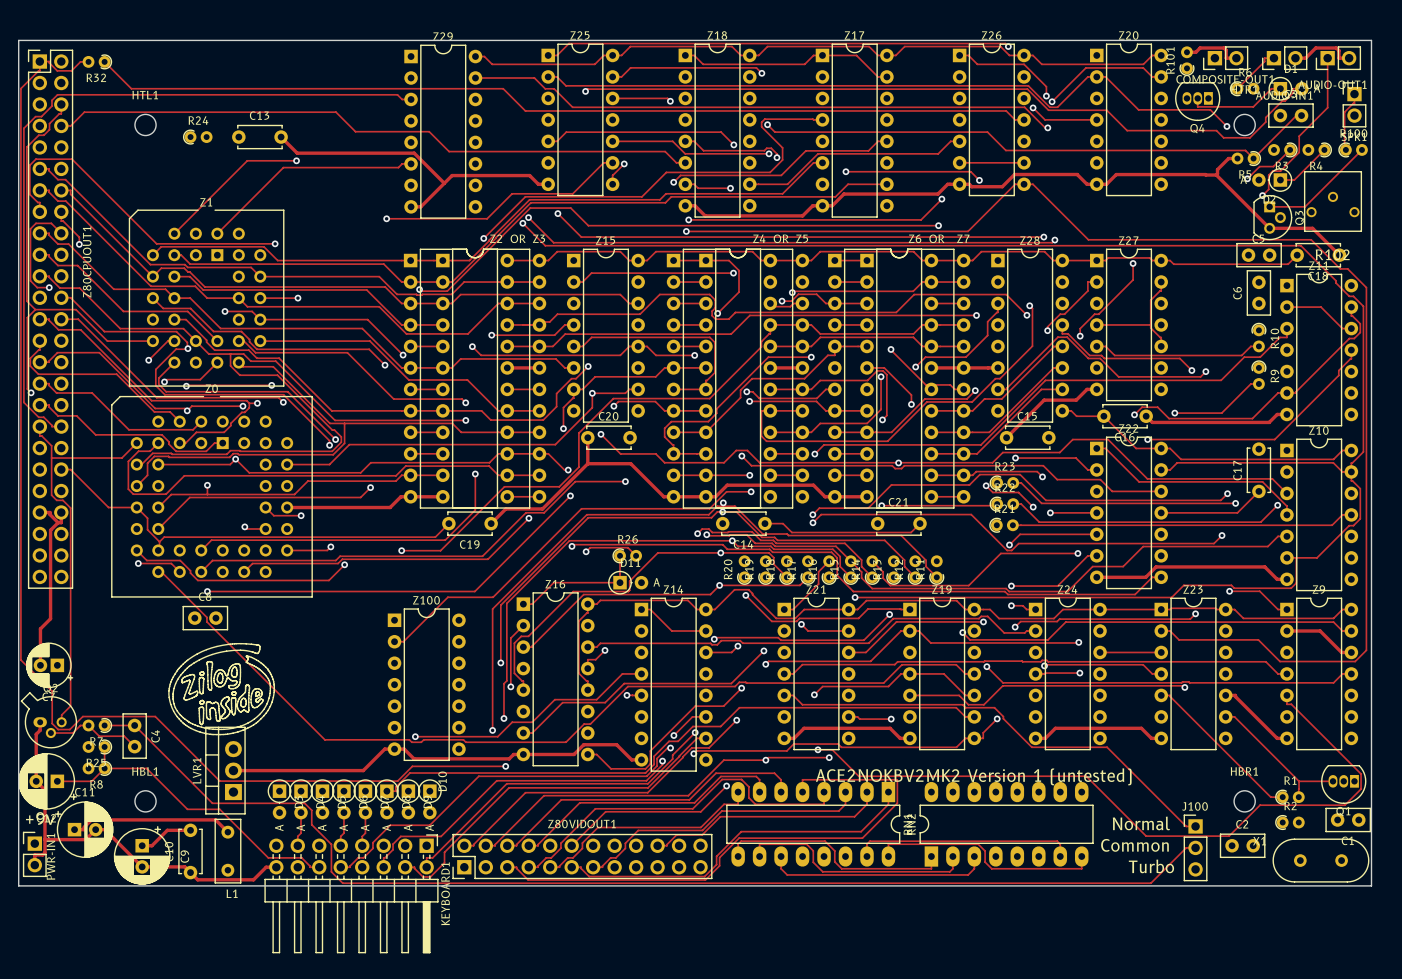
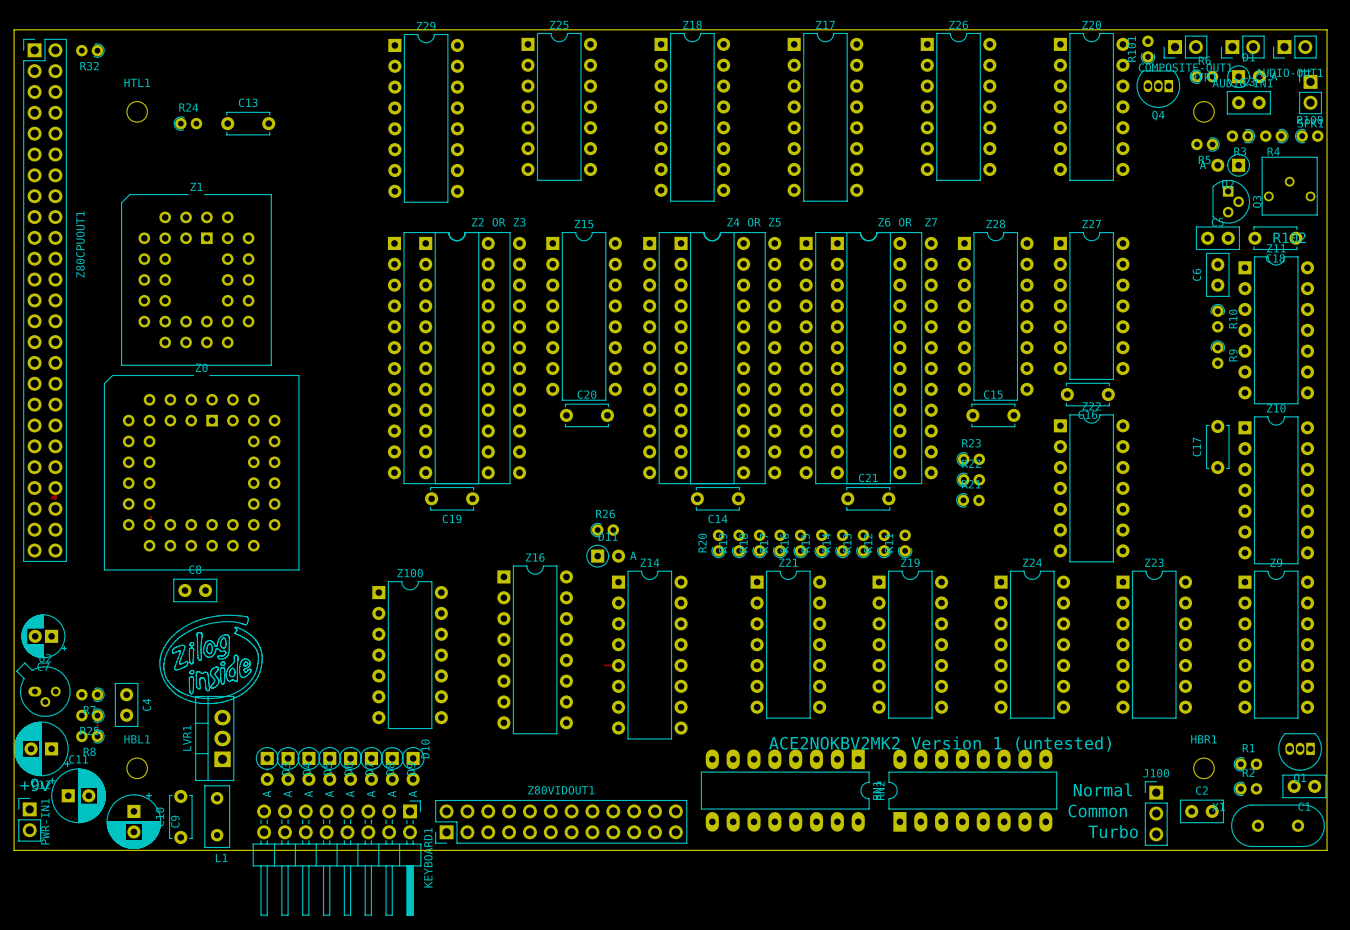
track: (1008, 46) (1005, 43) (569, 43) (557, 55) (548, 55) -> none
via: (1008, 46) -> none
track: (1186, 52) (1195, 52) (1200, 48) (1223, 48) (1226, 50) (1226, 58) (1236, 58) -> none
track: (685, 55) (694, 55) (703, 64) (804, 64) (813, 55) (856, 55) (878, 76) (886, 76) -> none
track: (959, 55) (968, 55) (977, 64) (1024, 64) (1046, 86) (1046, 96) -> none
track: (1161, 55) (1152, 55) (1143, 64) (1041, 64) (1032, 55) (1009, 55) (1000, 46) (904, 46) (895, 55) (878, 55) (869, 46) (767, 46) (758, 55) (740, 55) (731, 46) (630, 46) (621, 55) (603, 55) (594, 64) (492, 64) (484, 56) (475, 56) -> none
track: (1273, 58) (1264, 58) (1264, 61) (1237, 88) -> none
track: (1295, 58) (1305, 58) (1315, 48) (1336, 48) (1338, 50) (1338, 58) (1349, 58) -> none
track: (1327, 58) (1327, 107) (1299, 136) (1299, 152) (1280, 171) (1272, 171) (1268, 175) (1268, 189) (1262, 195) -> none
track: (88, 61) (80, 61) (71, 70) (57, 70) (49, 61) (39, 61) (39, 70) (20, 88) (20, 660) (52, 691) (52, 723) (58, 729) (69, 729) (82, 716) (155, 716) (219, 781) (397, 781) (412, 766) (505, 766) -> none
track: (104, 61) (131, 88) (503, 88) (525, 110) (1006, 110) (1015, 119) (1024, 119) -> none
track: (761, 73) (756, 67) (630, 67) (621, 76) (612, 76) -> none
via: (761, 73) -> none
track: (548, 76) (557, 76) (566, 85) (1028, 85) (1049, 107) (1057, 107) (1087, 76) (1105, 76) (1138, 109) (1210, 109) (1226, 126) -> none
track: (1161, 76) (1152, 76) (1143, 67) (1085, 67) (1052, 101) -> none
track: (475, 78) (534, 78) (545, 88) (554, 88) (572, 107) (1024, 107) (1045, 127) (1047, 127) -> none
track: (1280, 88) (1271, 88) (1253, 106) (1197, 106) (1197, 98) -> none
track: (1301, 88) (1292, 88) (1292, 93) (1265, 117) (1265, 122) (1250, 137) (1223, 137) (1216, 130) (1127, 130) (1106, 110) (1048, 110) (1027, 89) (587, 89) (585, 91) -> none
via: (585, 91) -> none
track: (1354, 94) (1354, 103) (1344, 112) (1345, 149) -> none
via: (1046, 96) -> none
track: (612, 98) (667, 98) (670, 101) -> none
track: (411, 99) (402, 99) (397, 94) (57, 94) (51, 100) (51, 106) (41, 116) (35, 116) (23, 128) (23, 402) (38, 417) (43, 417) (51, 426) (61, 426) -> none
via: (670, 101) -> none
via: (1052, 101) -> none
track: (61, 104) (61, 113) (49, 123) (49, 129) (43, 135) (38, 135) (26, 147) (26, 301) (35, 309) -> none
track: (1033, 107) (1045, 119) (1096, 119) -> none
via: (1033, 107) -> none
track: (1301, 115) (1296, 115) (1253, 158) (1245, 150) (1005, 150) (987, 132) (774, 132) (767, 124) -> none
track: (822, 119) (764, 119) (761, 122) (761, 126) (782, 147) (782, 159) (770, 172) (666, 172) (641, 196) (525, 196) (483, 238) -> none
via: (767, 124) -> none
track: (61, 125) (70, 125) (84, 112) (336, 112) (355, 131) (429, 131) (449, 151) (665, 151) (676, 162) (685, 162) -> none
via: (1226, 126) -> none
via: (1047, 127) -> none
track: (281, 137) (297, 153) (414, 153) (444, 183) -> none
track: (548, 141) (557, 141) (566, 132) (721, 132) (733, 144) -> none
track: (612, 141) (672, 141) (685, 153) (769, 153) -> none
track: (685, 141) (694, 141) (703, 150) (764, 150) (771, 148) (776, 153) (776, 157) -> none
track: (886, 141) (878, 141) (868, 150) (805, 150) (781, 175) (680, 175) (673, 182) -> none
track: (959, 141) (950, 141) (938, 153) (817, 153) (787, 184) (749, 184) -> none
via: (733, 144) -> none
track: (1290, 149) (1273, 166) (1259, 166) (1247, 178) -> none
track: (1324, 149) (1294, 180) (1280, 180) -> none
track: (1361, 149) (1305, 206) (1269, 206) -> none
via: (769, 153) -> none
via: (776, 157) -> none
track: (1237, 158) (1228, 158) (1217, 169) (1216, 175) -> none
track: (296, 160) (247, 160) (174, 233) -> none
via: (296, 160) -> none
track: (612, 162) (603, 162) (572, 193) (512, 193) (487, 218) (386, 218) -> none
track: (822, 162) (813, 162) (782, 193) (665, 193) (659, 199) (529, 199) (469, 260) (277, 260) (263, 246) (161, 246) (152, 255) -> none
track: (959, 162) (1024, 162) -> none
track: (411, 163) (402, 163) (398, 167) (283, 167) (217, 233) -> none
track: (624, 163) (612, 175) (612, 184) -> none
via: (624, 163) -> none
track: (39, 168) (49, 168) (57, 179) (65, 179) (150, 264) (184, 264) (187, 267) (251, 267) (260, 276) (379, 276) (397, 294) (451, 294) (464, 282) (539, 282) -> none
track: (845, 171) (970, 171) (979, 180) -> none
via: (845, 171) -> none
track: (1216, 175) (1116, 174) (1106, 184) (1087, 184) (1077, 174) (1014, 174) (1002, 186) (947, 184) (937, 194) (843, 194) (832, 205) (812, 205) (802, 215) (705, 215) (695, 205) (685, 205) -> none
track: (1216, 175) (1269, 228) (1312, 228) (1339, 255) -> none
via: (1247, 178) -> none
via: (979, 180) -> none
via: (673, 182) -> none
track: (548, 184) (538, 184) (529, 175) (452, 175) (420, 206) (411, 206) -> none
track: (685, 184) (694, 184) (698, 188) (730, 188) -> none
track: (886, 184) (848, 184) (835, 196) (671, 196) (665, 202) (530, 202) (452, 282) (401, 282) (383, 264) (190, 264) (181, 255) (174, 255) -> none
via: (730, 188) -> none
track: (39, 190) (49, 190) (57, 201) (65, 201) (150, 286) (195, 286) (207, 298) (238, 298) (247, 306) (379, 306) (406, 333) (467, 333) (498, 303) (539, 303) -> none
track: (61, 190) (70, 190) (70, 194) (152, 276) (161, 268) (184, 268) (204, 286) (385, 286) (401, 303) (451, 303) (460, 294) (620, 294) (629, 303) (638, 303) -> none
via: (1262, 195) -> none
track: (941, 199) (921, 219) (688, 219) -> none
via: (941, 199) -> none
track: (39, 211) (39, 202) (29, 194) (29, 165) (35, 159) (71, 159) (156, 243) (275, 243) -> none
track: (61, 211) (61, 221) (79, 237) (79, 244) -> none
track: (557, 213) (581, 237) (1043, 237) -> none
via: (557, 213) -> none
track: (528, 217) (553, 242) (1052, 242) (1054, 240) -> none
via: (528, 217) -> none
via: (386, 218) -> none
via: (688, 219) -> none
track: (522, 223) (545, 245) (1300, 245) (1349, 296) (1353, 296) (1363, 306) (1363, 451) (1351, 463) (1351, 480) (1360, 488) (1360, 518) (1353, 525) (1349, 525) (1317, 557) (1286, 557) -> none
via: (522, 223) -> none
track: (938, 225) (588, 225) (570, 208) (530, 208) (502, 235) -> none
via: (938, 225) -> none
track: (686, 231) (968, 231) (1015, 184) (1032, 184) (1088, 239) (1311, 239) (1340, 268) (1347, 268) (1366, 287) (1366, 650) (1355, 661) (1280, 661) (1258, 639) (1179, 639) (1170, 631) (1161, 631) -> none
via: (686, 231) -> none
track: (39, 233) (49, 233) (57, 244) (68, 244) (113, 289) (165, 289) (174, 298) (190, 298) (220, 328) (362, 328) (401, 367) (451, 367) (460, 358) (555, 358) (564, 367) (573, 367) -> none
track: (61, 233) (51, 223) (35, 223) (30, 228) (30, 280) (37, 287) (49, 287) -> none
track: (502, 235) (447, 291) (419, 289) -> none
via: (1043, 237) -> none
via: (483, 238) -> none
via: (1054, 240) -> none
via: (275, 243) -> none
via: (79, 244) -> none
track: (39, 254) (49, 254) (57, 265) (77, 265) (123, 311) (187, 311) (217, 341) -> none
track: (1297, 255) (1288, 264) (1173, 264) (1170, 260) (1152, 260) (1149, 257) (1053, 260) (1044, 251) (981, 251) (972, 260) (922, 260) (913, 251) (820, 251) (811, 260) (761, 260) (752, 251) (655, 251) (647, 260) (629, 260) (620, 251) (557, 251) (548, 260) (507, 260) -> none
track: (673, 260) (728, 260) (739, 270) (739, 292) (717, 313) -> none
track: (834, 260) (866, 260) -> none
track: (1133, 263) (1133, 279) (1098, 314) (1094, 314) (1080, 328) (1080, 336) -> none
via: (1133, 263) -> none
track: (733, 273) (591, 273) (582, 282) (573, 282) -> none
via: (733, 273) -> none
track: (39, 276) (49, 276) (59, 288) (79, 288) (120, 328) (183, 328) (208, 354) (243, 354) (250, 361) (275, 361) (335, 420) (465, 420) -> none
track: (174, 276) (189, 276) (203, 289) (366, 289) (401, 324) (442, 324) -> none
track: (673, 282) (705, 282) -> none
track: (834, 282) (866, 282) -> none
track: (963, 282) (922, 282) (913, 291) (792, 292) -> none
track: (1096, 282) (1087, 282) (1087, 290) (1064, 314) (1060, 314) (1047, 326) (1047, 330) -> none
track: (1161, 282) (1161, 290) (1150, 300) (1150, 327) (1161, 337) (1161, 346) -> none
via: (49, 287) -> none
via: (419, 289) -> none
via: (792, 292) -> none
track: (61, 297) (70, 297) (104, 331) (176, 331) (187, 342) (187, 348) (176, 349) (155, 369) (155, 385) (164, 394) (283, 394) (329, 440) (329, 445) -> none
track: (152, 298) (163, 308) (190, 308) (213, 331) (241, 331) (257, 349) (369, 349) (385, 365) -> none
track: (260, 298) (297, 298) -> none
via: (297, 298) -> none
track: (782, 301) (791, 301) (798, 294) (816, 294) (825, 303) (866, 303) -> none
via: (782, 301) -> none
track: (673, 303) (705, 303) -> none
track: (770, 303) (773, 306) (790, 306) (793, 303) (802, 303) -> none
track: (931, 303) (963, 303) -> none
track: (997, 303) (997, 312) (987, 321) (987, 335) (965, 357) (925, 357) (915, 366) -> none
track: (1029, 305) (1032, 308) (1032, 346) (999, 378) (995, 378) (972, 401) (926, 401) (887, 441) (766, 441) (761, 436) (761, 410) (802, 410) -> none
via: (1029, 305) -> none
track: (1286, 307) (1320, 307) (1342, 328) (1351, 328) -> none
track: (1351, 307) (1351, 315) (1360, 323) (1360, 332) (1354, 338) (1349, 338) (1295, 392) (1278, 392) (1252, 418) (1169, 418) (1157, 407) (1142, 407) (1134, 414) -> none
track: (35, 309) (75, 309) (107, 341) (152, 341) -> none
track: (35, 309) (27, 317) (27, 389) (31, 392) -> none
track: (224, 311) (252, 311) (260, 319) (367, 319) (403, 355) -> none
via: (224, 311) -> none
via: (717, 313) -> none
track: (976, 315) (749, 315) (731, 334) (565, 334) (552, 346) (507, 346) -> none
via: (976, 315) -> none
track: (1026, 315) (1006, 294) (914, 294) (896, 312) (735, 312) (728, 319) (715, 319) (712, 315) (712, 311) (715, 308) (715, 300) (709, 294) (659, 294) (640, 314) (557, 314) (549, 321) (535, 321) (532, 324) -> none
via: (1026, 315) -> none
track: (39, 319) (49, 319) (58, 329) (80, 329) (151, 400) (246, 400) (249, 403) -> none
track: (61, 319) (78, 319) (156, 397) (278, 397) (283, 402) -> none
track: (174, 319) (185, 319) (214, 350) (248, 350) (256, 358) (279, 358) (331, 410) (481, 410) (490, 420) (543, 420) (556, 406) (556, 393) (571, 378) (576, 378) (588, 366) -> none
track: (507, 324) (539, 324) -> none
track: (573, 324) (564, 324) (554, 335) (491, 335) -> none
track: (673, 324) (705, 324) -> none
track: (834, 324) (866, 324) -> none
track: (963, 324) (922, 324) (913, 333) (820, 333) (811, 324) (770, 324) (770, 333) (761, 341) (761, 346) (709, 398) (613, 398) (578, 433) (578, 467) (559, 486) (504, 486) (440, 550) (401, 550) -> none
track: (1062, 324) (1062, 333) (1068, 333) (1089, 355) (1101, 355) (1104, 358) (1179, 358) (1191, 370) -> none
track: (1096, 324) (1150, 324) -> none
track: (1286, 328) (1286, 337) (1279, 337) (1260, 357) (1244, 357) (1221, 380) (1045, 380) (980, 444) (823, 444) (814, 454) -> none
via: (1047, 330) -> none
via: (491, 335) -> none
via: (1080, 336) -> none
track: (39, 340) (39, 350) (30, 358) (30, 366) (38, 374) (116, 374) (154, 411) (170, 411) (179, 421) -> none
track: (174, 341) (167, 341) (148, 360) -> none
track: (238, 341) (243, 341) (255, 352) (347, 352) (393, 399) (462, 399) (465, 402) -> none
track: (260, 341) (369, 341) (408, 379) (467, 379) (498, 410) (539, 410) -> none
track: (410, 346) (442, 346) -> none
track: (472, 346) (481, 355) (620, 355) (629, 346) (647, 346) (656, 355) (694, 355) -> none
via: (472, 346) -> none
track: (573, 346) (582, 346) (591, 337) (709, 337) (714, 342) (714, 372) (705, 380) (705, 389) (673, 389) -> none
track: (673, 346) (705, 346) -> none
track: (770, 346) (811, 346) (820, 337) (913, 337) (922, 346) (963, 346) -> none
track: (866, 346) (834, 346) (834, 355) (827, 355) (804, 378) (752, 378) (740, 390) (740, 397) (705, 432) (673, 432) -> none
track: (1062, 346) (1053, 346) (1001, 398) (984, 398) (972, 410) (931, 410) -> none
track: (1096, 346) (1105, 346) (1114, 355) (1241, 355) (1250, 346) (1258, 346) -> none
via: (187, 348) -> none
track: (891, 349) (925, 384) (950, 384) (954, 389) (963, 389) -> none
via: (891, 349) -> none
track: (1351, 350) (1351, 358) (1338, 370) (1338, 375) (1274, 439) (1147, 439) -> none
track: (230, 354) (230, 365) (239, 375) (277, 375) (341, 436) (341, 442) (332, 451) (230, 450) (226, 454) (152, 453) (141, 464) (136, 464) -> none
via: (403, 355) -> none
via: (694, 355) -> none
track: (811, 357) (768, 357) (716, 408) (716, 413) (708, 421) (671, 421) (664, 428) (664, 436) (673, 444) (673, 453) (705, 453) -> none
via: (811, 357) -> none
via: (148, 360) -> none
track: (39, 362) (49, 362) (57, 352) (99, 352) (155, 408) (184, 408) (187, 410) (191, 406) (242, 406) -> none
track: (174, 362) (158, 378) (158, 384) (166, 391) (287, 391) (335, 439) -> none
track: (217, 362) (200, 379) (166, 379) (164, 381) -> none
track: (238, 362) (243, 366) (273, 366) (329, 423) (452, 423) (461, 432) (539, 432) -> none
via: (385, 365) -> none
via: (588, 366) -> none
via: (915, 366) -> none
track: (507, 367) (539, 367) -> none
track: (705, 367) (664, 367) (655, 376) (595, 376) (582, 389) (573, 389) (573, 398) (563, 407) (563, 428) -> none
track: (770, 367) (802, 367) -> none
track: (866, 367) (884, 367) (911, 395) (911, 404) -> none
track: (931, 367) (997, 367) -> none
track: (1062, 367) (1053, 367) (989, 432) (931, 432) -> none
via: (1191, 370) -> none
track: (1205, 371) (1200, 376) (1118, 376) (1100, 358) (1088, 358) (1067, 337) (1057, 337) (1006, 389) (997, 389) -> none
via: (1205, 371) -> none
track: (881, 376) (881, 409) (867, 423) (820, 423) (811, 432) (770, 432) -> none
via: (881, 376) -> none
via: (164, 381) -> none
track: (39, 383) (49, 383) (56, 392) (92, 392) (128, 429) (193, 429) (201, 421) -> none
track: (1258, 383) (1250, 383) (1221, 413) (1174, 413) -> none
track: (271, 385) (186, 386) -> none
via: (271, 385) -> none
via: (186, 386) -> none
track: (410, 389) (442, 389) -> none
track: (507, 389) (539, 389) -> none
track: (638, 389) (629, 389) (625, 393) (592, 393) (592, 407) (555, 444) (349, 444) (329, 464) (287, 464) -> none
track: (770, 389) (811, 389) (820, 380) (867, 380) (877, 370) (883, 370) (886, 374) (886, 415) (882, 419) -> none
track: (834, 389) (825, 389) (816, 398) (759, 398) (752, 391) (746, 391) -> none
track: (1062, 389) (1041, 389) (977, 453) (931, 453) -> none
track: (1096, 389) (1087, 389) (1076, 400) (1044, 400) (1006, 437) -> none
track: (975, 390) (966, 398) (924, 398) (891, 432) (834, 432) -> none
via: (975, 390) -> none
via: (746, 391) -> none
via: (31, 392) -> none
via: (592, 393) -> none
track: (749, 401) (816, 401) (825, 410) (866, 410) -> none
via: (749, 401) -> none
via: (283, 402) -> none
via: (465, 402) -> none
track: (249, 403) (257, 403) -> none
track: (249, 403) (249, 407) (244, 412) (241, 412) (224, 432) (196, 432) (185, 443) (179, 443) -> none
via: (257, 403) -> none
via: (911, 404) -> none
track: (39, 405) (49, 405) (57, 415) (76, 415) (95, 434) (161, 434) (176, 451) (206, 451) (214, 443) (222, 443) -> none
via: (242, 406) -> none
track: (613, 406) (618, 401) (655, 401) (664, 410) (705, 410) -> none
via: (613, 406) -> none
via: (187, 410) -> none
track: (1062, 410) (1071, 410) (1076, 416) (1103, 416) (1136, 448) (1170, 448) (1181, 459) (1333, 459) (1342, 450) (1351, 450) -> none
via: (1174, 413) -> none
via: (1134, 414) -> none
track: (1286, 414) (1277, 414) (1269, 422) (1152, 422) (1146, 416) -> none
via: (882, 419) -> none
via: (465, 420) -> none
track: (344, 423) (344, 443) (333, 454) (233, 453) (229, 457) (154, 456) (147, 463) (147, 475) (136, 486) -> none
track: (39, 426) (39, 435) (51, 445) (51, 495) (56, 500) (62, 500) (70, 508) (70, 706) (61, 715) (61, 722) -> none
via: (563, 428) -> none
track: (410, 432) (442, 432) -> none
track: (600, 434) (620, 453) (655, 453) (664, 462) (724, 462) (736, 450) (747, 450) (759, 462) (992, 462) (1002, 452) (1059, 452) (1072, 439) (1108, 439) (1147, 478) (1272, 478) (1286, 493) -> none
via: (600, 434) -> none
track: (587, 437) (587, 463) -> none
via: (335, 439) -> none
via: (1147, 439) -> none
track: (136, 443) (121, 458) (51, 458) -> none
track: (158, 443) (150, 451) (138, 451) (128, 461) (128, 489) (133, 494) (166, 494) (184, 475) (396, 475) (405, 466) (489, 466) (498, 475) (539, 475) -> none
via: (329, 445) -> none
track: (1096, 448) (1105, 448) (1139, 481) (1262, 481) (1286, 506) (1286, 514) -> none
track: (410, 453) (442, 453) -> none
track: (770, 453) (802, 453) -> none
track: (834, 453) (866, 453) -> none
via: (814, 454) -> none
track: (741, 456) (751, 465) (892, 465) (895, 468) (901, 468) (904, 465) (1043, 465) (1057, 479) (1100, 479) (1112, 491) (1161, 491) -> none
via: (741, 456) -> none
track: (1015, 458) (1075, 458) (1087, 469) (1096, 469) -> none
via: (1015, 458) -> none
via: (235, 459) -> none
via: (898, 462) -> none
track: (587, 463) (630, 463) (663, 496) (715, 496) (727, 485) (813, 485) (825, 496) (866, 496) -> none
track: (587, 463) (542, 508) (505, 508) (491, 523) -> none
track: (158, 464) (230, 464) (235, 459) (249, 472) (360, 472) (370, 462) (489, 462) (498, 453) (548, 453) (564, 470) (568, 470) -> none
track: (61, 469) (70, 469) (108, 507) (136, 507) (147, 518) (147, 529) (159, 541) (164, 537) (435, 537) (448, 523) -> none
track: (1161, 469) (1170, 469) (1177, 462) (1333, 462) (1342, 471) (1351, 471) -> none
via: (568, 470) -> none
track: (475, 474) (475, 510) (445, 540) (211, 540) (201, 550) -> none
via: (475, 474) -> none
track: (442, 475) (401, 475) (395, 481) (307, 481) (294, 494) (171, 494) (158, 507) -> none
track: (673, 475) (749, 475) -> none
via: (749, 475) -> none
track: (770, 475) (802, 475) -> none
track: (834, 475) (866, 475) -> none
track: (931, 475) (972, 475) (976, 471) (1037, 471) (1042, 476) -> none
via: (1042, 476) -> none
track: (625, 481) (575, 481) (544, 512) (526, 512) (482, 556) (340, 556) (335, 560) (212, 560) (201, 571) -> none
via: (625, 481) -> none
track: (1013, 482) (1021, 482) (1041, 503) (1235, 503) -> none
track: (207, 485) (207, 494) -> none
via: (207, 485) -> none
track: (986, 485) (992, 492) (1018, 492) (1033, 507) -> none
via: (986, 485) -> none
track: (370, 487) (360, 497) (189, 497) (158, 528) -> none
via: (370, 487) -> none
track: (751, 491) (726, 491) (709, 508) (581, 508) (493, 597) (447, 597) (403, 641) (394, 641) -> none
via: (751, 491) -> none
track: (1258, 491) (1237, 512) (1161, 512) -> none
track: (1227, 493) (1220, 500) (1045, 500) (1020, 474) (979, 474) (969, 484) (891, 484) (868, 508) (819, 508) (812, 514) -> none
via: (1227, 493) -> none
track: (570, 495) (474, 591) (207, 591) -> none
via: (570, 495) -> none
track: (442, 496) (400, 496) (390, 507) (287, 507) -> none
track: (507, 496) (539, 496) -> none
track: (931, 496) (963, 496) -> none
via: (723, 502) -> none
via: (1235, 503) -> none
track: (997, 504) (995, 505) (881, 505) -> none
track: (1013, 504) (1021, 504) (1039, 522) (1260, 522) (1277, 505) -> none
via: (881, 505) -> none
via: (1277, 505) -> none
track: (265, 507) (273, 515) (301, 515) -> none
via: (1033, 507) -> none
via: (722, 511) -> none
track: (39, 512) (49, 512) (58, 522) (50, 530) (50, 618) (40, 628) (40, 665) -> none
track: (1050, 512) (1096, 512) -> none
via: (1050, 512) -> none
via: (812, 514) -> none
track: (1351, 514) (1342, 514) (1332, 525) (1012, 525) -> none
via: (301, 515) -> none
track: (528, 518) (487, 559) (342, 559) (338, 563) (252, 563) (244, 571) -> none
via: (528, 518) -> none
track: (812, 522) (821, 514) (971, 514) (1007, 550) (1011, 550) (1018, 543) (1213, 543) (1222, 535) -> none
via: (812, 522) -> none
track: (764, 523) (783, 523) (791, 532) (911, 532) (920, 523) -> none
track: (244, 526) (246, 528) (265, 528) -> none
via: (244, 526) -> none
track: (697, 533) (702, 529) (708, 529) (712, 532) (752, 531) (760, 540) (773, 540) (776, 543) (844, 543) (861, 560) (861, 566) (872, 577) -> none
via: (697, 533) -> none
track: (706, 534) (746, 534) (755, 543) (772, 543) (775, 546) (835, 546) (861, 571) (861, 578) (872, 588) (1006, 588) (1009, 591) (1067, 591) (1092, 566) (1123, 566) (1143, 546) (1267, 546) (1278, 536) (1286, 536) -> none
via: (706, 534) -> none
track: (1096, 534) (1020, 534) (1009, 544) -> none
via: (1222, 535) -> none
via: (732, 540) -> none
via: (1009, 544) -> none
track: (330, 546) (327, 550) (287, 550) -> none
via: (330, 546) -> none
track: (571, 546) (573, 544) (722, 544) (727, 549) (769, 549) (772, 552) (831, 552) (837, 557) (837, 575) (853, 591) (1004, 591) (1007, 594) (1135, 594) (1152, 577) (1161, 577) -> none
via: (571, 546) -> none
track: (136, 550) (146, 560) (180, 560) (197, 580) (328, 580) (344, 564) -> none
via: (401, 550) -> none
track: (586, 551) (590, 547) (627, 547) (636, 555) -> none
via: (586, 551) -> none
via: (720, 552) -> none
track: (1077, 553) (1000, 553) (968, 585) (890, 585) (883, 578) (883, 571) (872, 561) -> none
via: (1077, 553) -> none
track: (620, 555) (620, 582) (553, 582) (532, 604) (523, 604) -> none
track: (1096, 555) (1087, 555) (1057, 586) (1011, 586) -> none
track: (1296, 557) (1296, 583) (1291, 588) (1234, 588) (1231, 585) (1183, 585) (1171, 597) (855, 597) -> none
track: (829, 561) (818, 571) (818, 584) (793, 609) (784, 609) -> none
track: (138, 563) (171, 563) (179, 571) -> none
via: (138, 563) -> none
via: (344, 564) -> none
track: (158, 571) (161, 571) (206, 617) (206, 621) (324, 739) (409, 739) (411, 742) (421, 742) (423, 739) (463, 739) (465, 742) (565, 742) (584, 724) (590, 724) (627, 686) (735, 686) (739, 682) (883, 683) (901, 664) (956, 664) (965, 673) (974, 673) -> none
track: (786, 577) (773, 564) (773, 557) (769, 552) (657, 552) (629, 581) (628, 591) (573, 591) (528, 636) (521, 636) (514, 643) (514, 673) (523, 681) (523, 690) -> none
track: (808, 577) (799, 585) (719, 585) (710, 594) (583, 594) (532, 647) (523, 647) -> none
track: (850, 577) (840, 566) (840, 556) (832, 549) (773, 549) (770, 546) (737, 546) (732, 540) (569, 540) (506, 603) (506, 680) (503, 683) (503, 718) -> none
track: (915, 577) (904, 566) (904, 560) (884, 540) (777, 540) (774, 537) (761, 537) (736, 511) (717, 511) (711, 517) (588, 517) (500, 605) (500, 662) -> none
track: (936, 577) (926, 566) (926, 560) (901, 535) (762, 534) (734, 506) (717, 506) (708, 514) (586, 514) (492, 609) (492, 730) -> none
track: (1096, 577) (1145, 577) (1156, 566) (1264, 566) (1277, 579) (1286, 579) -> none
via: (719, 585) -> none
via: (1011, 586) -> none
via: (207, 591) -> none
track: (1229, 591) (1259, 591) (1278, 609) (1286, 609) -> none
via: (1229, 591) -> none
track: (745, 595) (771, 621) (796, 621) (799, 618) (858, 618) (867, 609) (909, 609) -> none
via: (745, 595) -> none
via: (855, 597) -> none
track: (1011, 605) (1022, 605) (1026, 609) (1035, 609) -> none
via: (1011, 605) -> none
track: (641, 609) (650, 609) (671, 631) (705, 631) -> none
track: (1351, 609) (1342, 609) (1333, 618) (1243, 618) (1234, 609) (1171, 608) (1062, 609) (1053, 618) (999, 618) (990, 609) (965, 609) (956, 600) (866, 600) (857, 609) (804, 609) (795, 618) (776, 618) (748, 589) (734, 589) (714, 609) (697, 609) (687, 600) (600, 600) (596, 604) (587, 604) (587, 613) (578, 621) (578, 673) (587, 681) (587, 690) -> none
track: (1195, 613) (1190, 619) (1059, 619) (1057, 621) (1020, 621) (1015, 627) -> none
via: (1195, 613) -> none
track: (889, 614) (863, 640) (780, 640) (778, 637) (715, 637) (714, 639) -> none
via: (889, 614) -> none
track: (983, 621) (896, 621) (865, 652) (848, 652) -> none
via: (983, 621) -> none
track: (801, 624) (808, 631) (848, 631) -> none
via: (801, 624) -> none
track: (523, 625) (510, 638) (510, 686) -> none
via: (1015, 627) -> none
track: (1035, 631) (1004, 632) (987, 616) (981, 616) (979, 618) (893, 618) (868, 643) (742, 643) (740, 640) (721, 640) (717, 644) (600, 643) (596, 647) (587, 647) -> none
track: (1286, 631) (1320, 631) (1341, 652) (1351, 652) -> none
track: (1351, 631) (1342, 631) (1333, 622) (1065, 622) (1047, 639) (970, 639) (962, 632) -> none
via: (962, 632) -> none
via: (714, 639) -> none
track: (1078, 642) (930, 642) (918, 631) (901, 631) (870, 661) (768, 661) (765, 664) -> none
via: (1078, 642) -> none
track: (737, 646) (731, 652) (705, 652) -> none
via: (737, 646) -> none
track: (605, 650) (595, 659) (587, 659) (587, 668) -> none
via: (605, 650) -> none
track: (763, 650) (731, 683) (624, 683) (605, 702) (562, 702) (532, 733) (523, 733) -> none
via: (763, 650) -> none
track: (1100, 652) (1161, 652) -> none
via: (500, 662) -> none
via: (765, 664) -> none
track: (1044, 665) (1143, 664) (1152, 673) (1161, 673) -> none
via: (1044, 665) -> none
track: (986, 666) (1003, 682) (1333, 682) (1342, 673) (1351, 673) -> none
via: (986, 666) -> none
track: (641, 673) (622, 673) (596, 699) (554, 699) (532, 722) (512, 722) (497, 736) (415, 736) -> none
track: (784, 673) (793, 673) (802, 664) (894, 664) (897, 661) (1042, 660) (1265, 661) (1278, 673) (1286, 673) -> none
track: (1079, 673) (1035, 673) -> none
via: (1079, 673) -> none
via: (510, 686) -> none
track: (1184, 687) (1183, 685) (1002, 685) (983, 704) (968, 704) (959, 695) (909, 695) -> none
via: (1184, 687) -> none
track: (741, 688) (723, 706) (695, 706) (650, 751) (650, 763) (645, 768) (611, 768) (596, 754) (587, 754) -> none
via: (741, 688) -> none
track: (814, 694) (822, 686) (888, 686) (901, 673) (943, 673) (965, 695) (974, 695) -> none
via: (814, 694) -> none
via: (626, 695) -> none
track: (784, 695) (793, 695) (802, 704) (962, 704) (965, 707) (994, 707) (1031, 747) (1107, 747) (1186, 826) (1195, 826) -> none
track: (1161, 695) (1170, 695) (1270, 797) (1282, 797) -> none
track: (1225, 695) (1235, 695) (1277, 738) (1286, 738) -> none
track: (1286, 695) (1286, 704) (1291, 704) (1361, 773) (1361, 789) (1344, 805) (1260, 805) (1229, 836) (1146, 836) (1086, 776) (858, 776) (832, 749) (817, 749) -> none
track: (705, 716) (692, 716) (673, 735) -> none
track: (848, 716) (857, 716) (859, 719) (891, 719) -> none
track: (974, 716) (965, 716) (956, 707) (739, 707) (720, 726) (692, 726) (678, 741) (669, 741) (654, 756) (654, 764) (645, 773) (409, 773) (395, 787) (395, 791) (386, 791) -> none
track: (1225, 716) (1234, 716) (1299, 781) -> none
via: (503, 718) -> none
track: (997, 718) (983, 732) (983, 738) (965, 738) (956, 747) (841, 747) (838, 744) (793, 744) (786, 750) (696, 750) (693, 753) -> none
via: (997, 718) -> none
via: (891, 719) -> none
track: (736, 720) (709, 747) (691, 747) (647, 792) (525, 792) (473, 845) (464, 845) -> none
via: (736, 720) -> none
track: (40, 722) (40, 730) (36, 734) (36, 781) (44, 790) (44, 852) (42, 854) (34, 854) (34, 865) -> none
track: (104, 725) (134, 725) (212, 803) (304, 803) (311, 810) (311, 824) (331, 844) (331, 871) (342, 883) (1150, 883) (1186, 847) (1195, 847) -> none
via: (492, 730) -> none
track: (695, 732) (647, 783) (506, 783) (432, 857) (426, 857) (426, 867) -> none
via: (695, 732) -> none
track: (50, 733) (72, 733) (80, 725) (88, 725) (99, 736) (124, 736) (134, 746) -> none
via: (673, 735) -> none
via: (415, 736) -> none
track: (705, 738) (697, 738) (648, 787) (509, 787) (444, 852) (444, 862) (430, 876) (423, 876) (414, 867) (405, 867) -> none
track: (784, 738) (794, 738) (804, 728) (890, 728) (900, 738) (909, 738) -> none
track: (1035, 738) (1045, 738) (1055, 728) (1141, 728) (1151, 738) (1161, 738) -> none
track: (670, 748) (667, 748) (657, 758) (657, 765) (646, 776) (478, 776) (429, 825) (390, 825) (372, 842) (372, 848) (363, 857) (358, 857) (350, 867) (340, 867) -> none
via: (670, 748) -> none
via: (817, 749) -> none
via: (693, 753) -> none
track: (829, 757) (723, 760) (688, 795) (544, 795) (495, 845) (485, 845) -> none
via: (829, 757) -> none
track: (641, 759) (631, 759) (616, 744) (583, 744) (574, 754) (513, 754) (509, 758) (414, 758) (404, 749) (384, 749) (363, 770) (233, 770) -> none
via: (765, 760) -> none
track: (662, 761) (662, 764) (646, 780) (496, 780) (441, 836) (400, 836) (393, 844) (393, 849) (383, 857) (383, 867) -> none
via: (662, 761) -> none
via: (505, 766) -> none
track: (57, 781) (91, 781) (104, 768) (146, 768) (187, 809) (219, 809) (268, 857) (301, 857) (309, 867) (319, 867) -> none
track: (1299, 781) (1333, 781) -> none
track: (1299, 781) (1298, 797) -> none
track: (726, 786) (700, 811) (605, 811) (571, 845) -> none
via: (726, 786) -> none
track: (738, 792) (738, 804) (724, 804) (700, 827) (597, 827) (582, 843) (582, 848) (572, 857) (567, 857) (559, 867) (550, 867) -> none
track: (759, 792) (759, 779) (756, 776) (720, 776) (694, 802) (579, 802) (538, 845) (528, 845) -> none
track: (781, 792) (781, 779) (774, 773) (715, 773) (689, 799) (561, 799) (516, 845) (507, 845) -> none
track: (802, 792) (802, 779) (897, 780) (897, 803) (862, 838) (739, 838) (719, 857) (719, 865) (705, 880) (528, 880) (516, 867) (507, 867) -> none
track: (824, 792) (824, 804) (755, 804) (748, 797) (748, 786) (741, 779) (722, 779) (692, 808) (595, 808) (560, 843) (560, 848) (551, 857) (546, 857) (538, 867) (528, 867) -> none
track: (845, 792) (845, 804) (838, 811) (721, 811) (702, 830) (638, 830) (625, 843) (625, 848) (615, 857) (610, 857) (602, 867) (593, 867) -> none
track: (866, 792) (866, 804) (854, 816) (720, 816) (702, 834) (676, 834) (666, 845) (657, 845) -> none
track: (888, 792) (888, 804) (861, 831) (741, 831) (716, 856) (716, 864) (704, 876) (589, 876) (581, 867) (571, 867) -> none
track: (301, 812) (301, 833) (297, 836) (297, 845) -> none
track: (343, 812) (343, 833) (340, 836) (340, 845) -> none
track: (365, 812) (365, 833) (362, 836) (362, 845) -> none
track: (74, 829) (84, 829) (91, 819) (215, 819) (227, 832) -> none
track: (190, 830) (167, 830) (151, 845) (142, 845) -> none
track: (44, 839) (85, 839) (95, 829) (104, 829) (142, 866) (184, 866) (197, 879) (253, 879) (266, 867) (276, 867) -> none
track: (738, 856) (738, 844) (741, 841) (824, 841) (834, 850) (834, 861) (841, 868) (931, 868) (931, 856) -> none
track: (759, 856) (759, 844) (806, 844) (813, 850) (813, 862) (822, 871) (949, 871) (952, 868) (952, 856) -> none
track: (781, 856) (781, 868) (787, 874) (968, 874) (974, 868) (974, 856) -> none
track: (866, 856) (866, 844) (869, 841) (1057, 841) (1060, 844) (1060, 856) -> none
track: (888, 856) (888, 844) (978, 844) (985, 851) (985, 862) (991, 868) (1081, 868) (1081, 856) -> none

